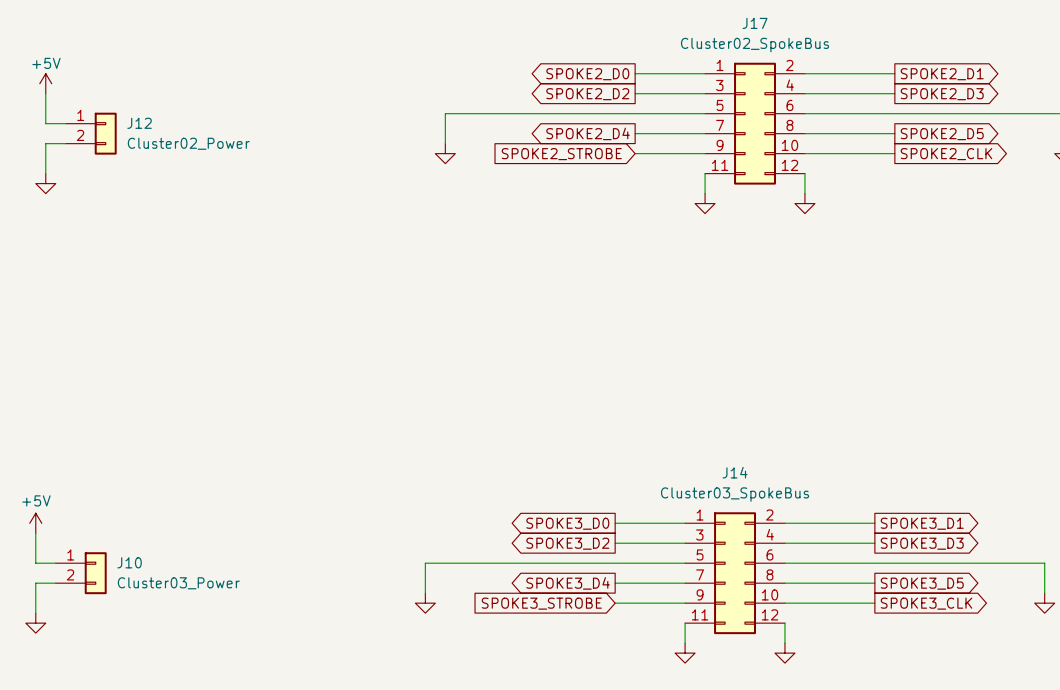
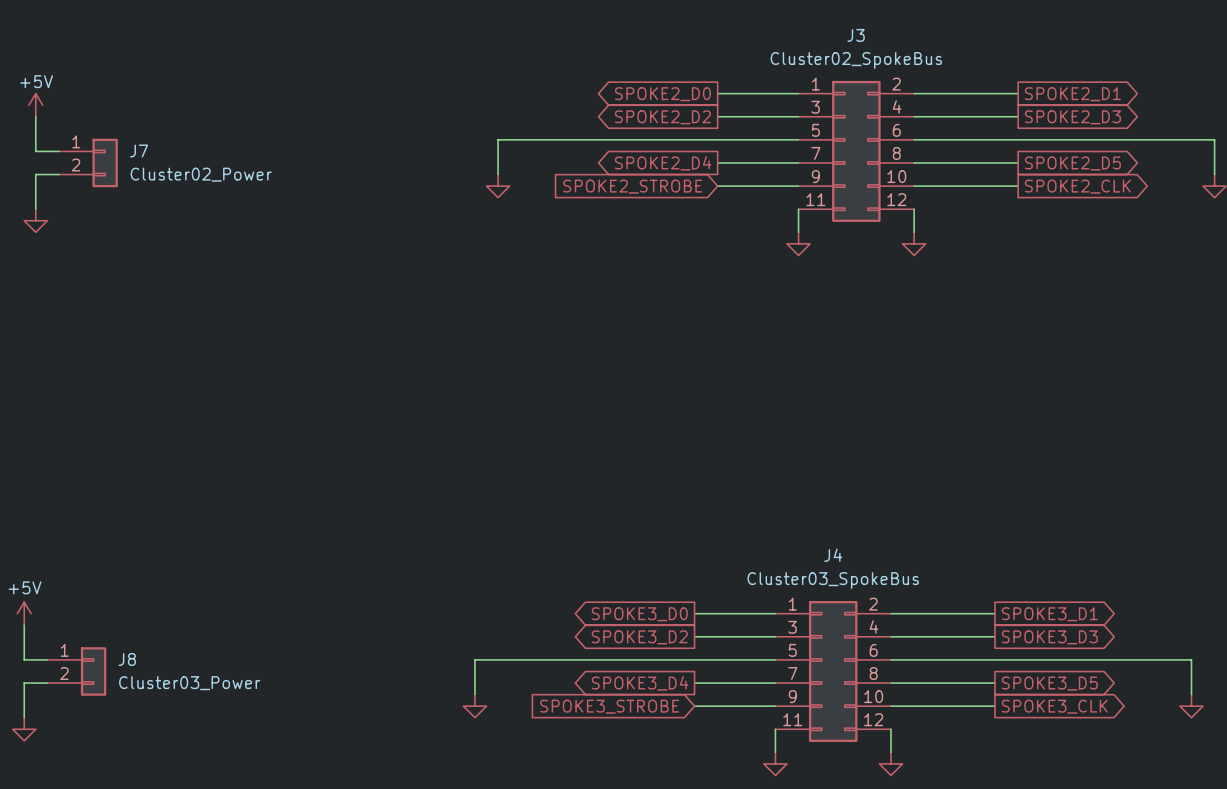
J17 name: J17 (755, 23) -> J3 (856, 35)
J12 name: J12 (139, 123) -> J7 (139, 150)
J14 name: J14 (735, 472) -> J4 (833, 555)
J10 name: J10 (129, 562) -> J8 (127, 659)

